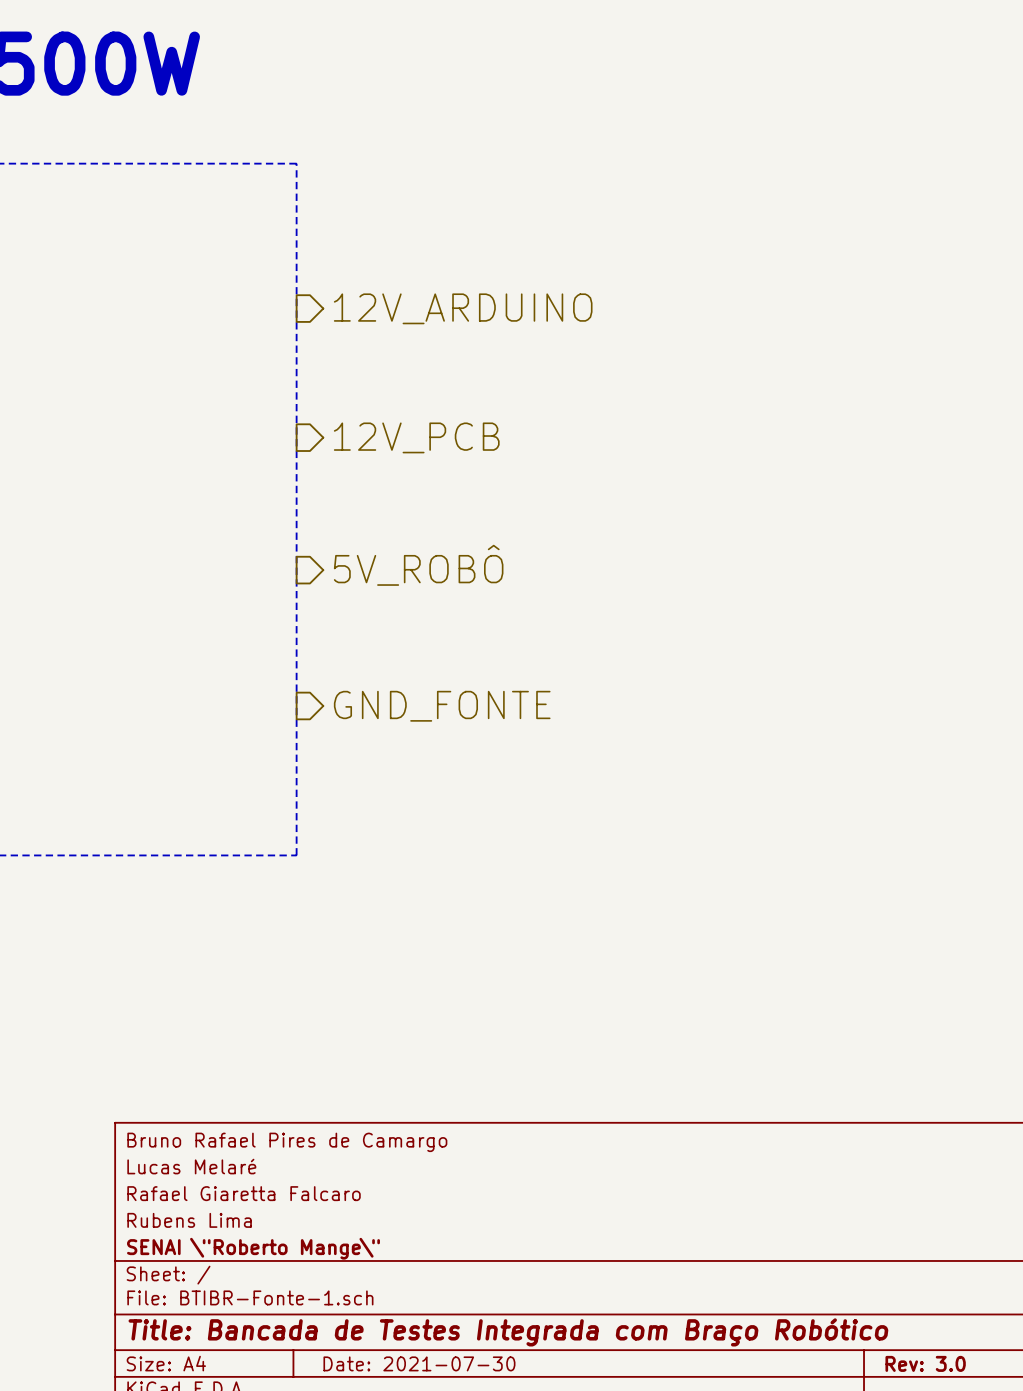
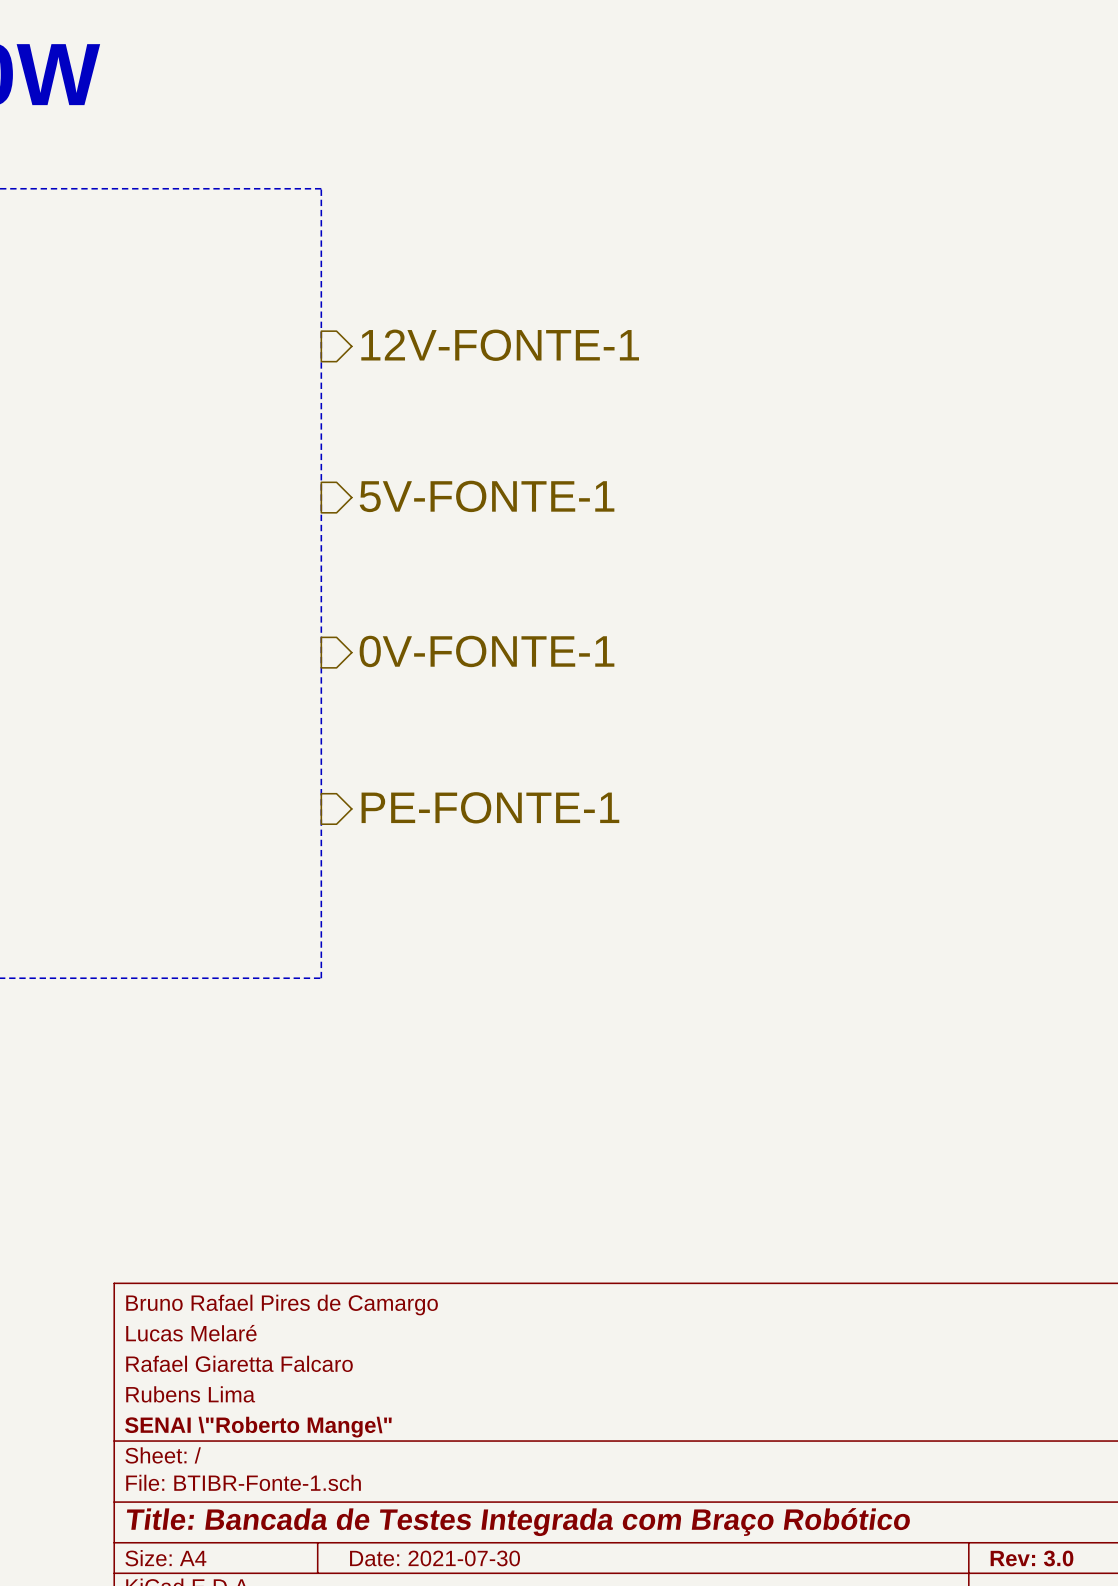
hierarchical label: 12V_ARDUINO (463, 308) -> 12V-FONTE-1 (500, 345)
hierarchical label: 12V_PCB (416, 437) -> 5V-FONTE-1 (487, 496)
hierarchical label: 5V_ROBÔ (418, 565) -> 0V-FONTE-1 (487, 651)
hierarchical label: GND_FONTE (442, 706) -> PE-FONTE-1 (490, 807)

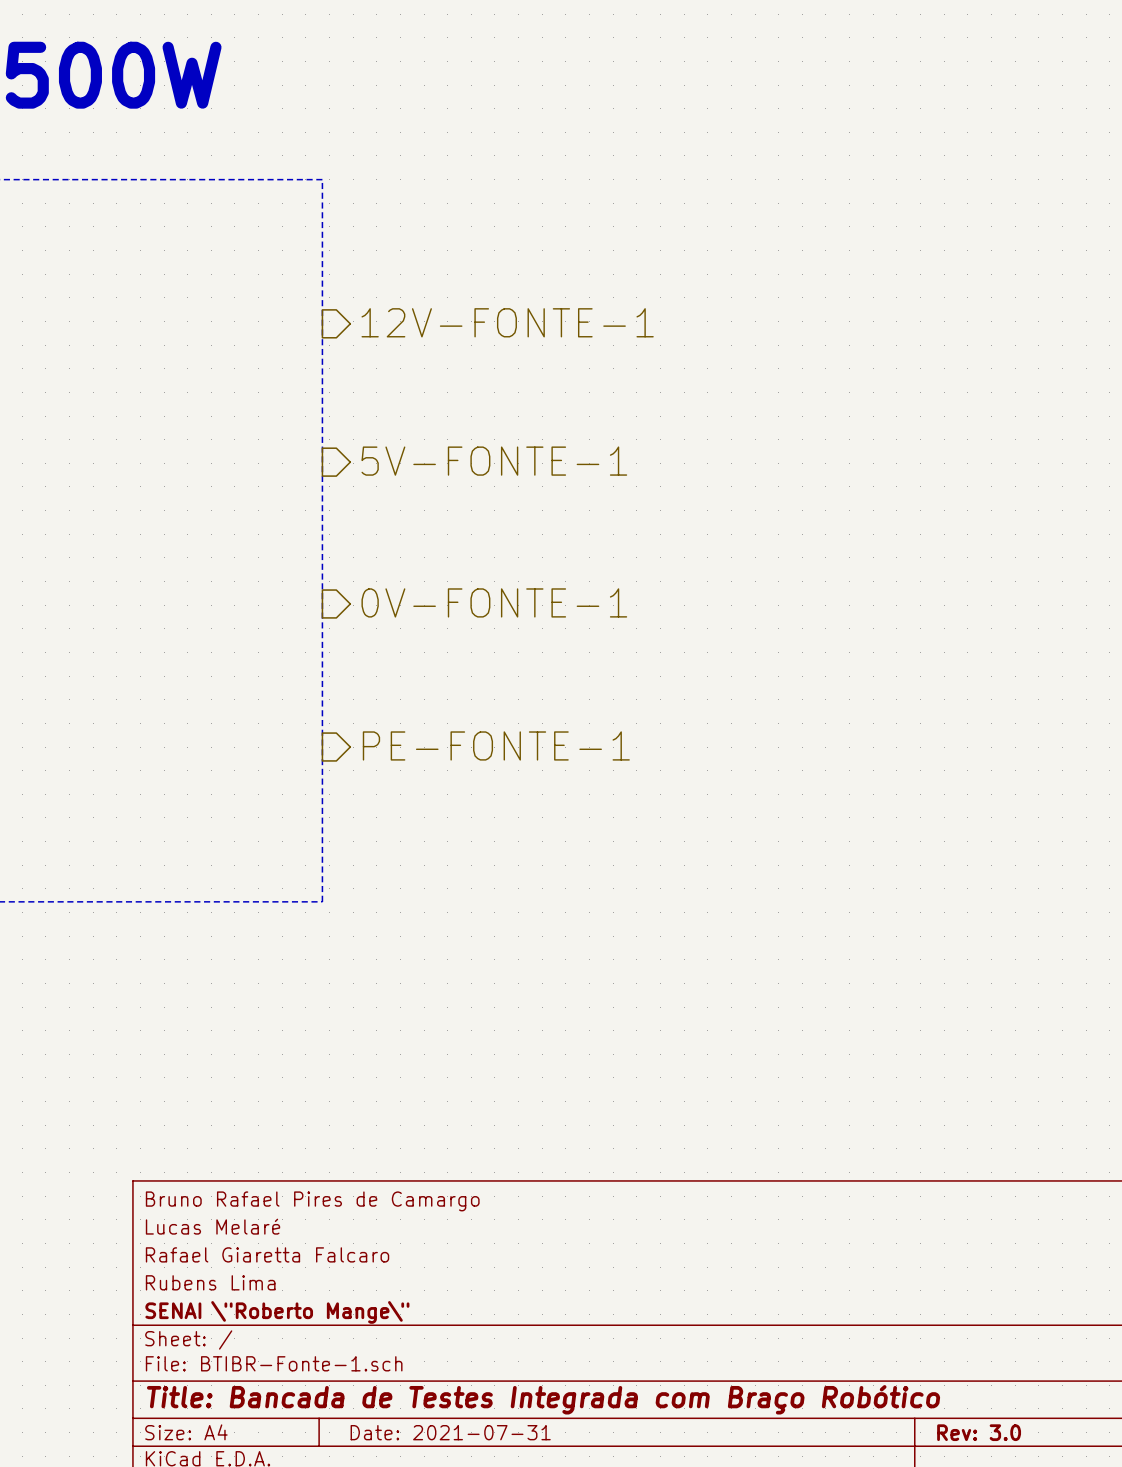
title block: Date: 2021-07-30 (435, 1558) -> Date: 2021-07-31 (450, 1432)

